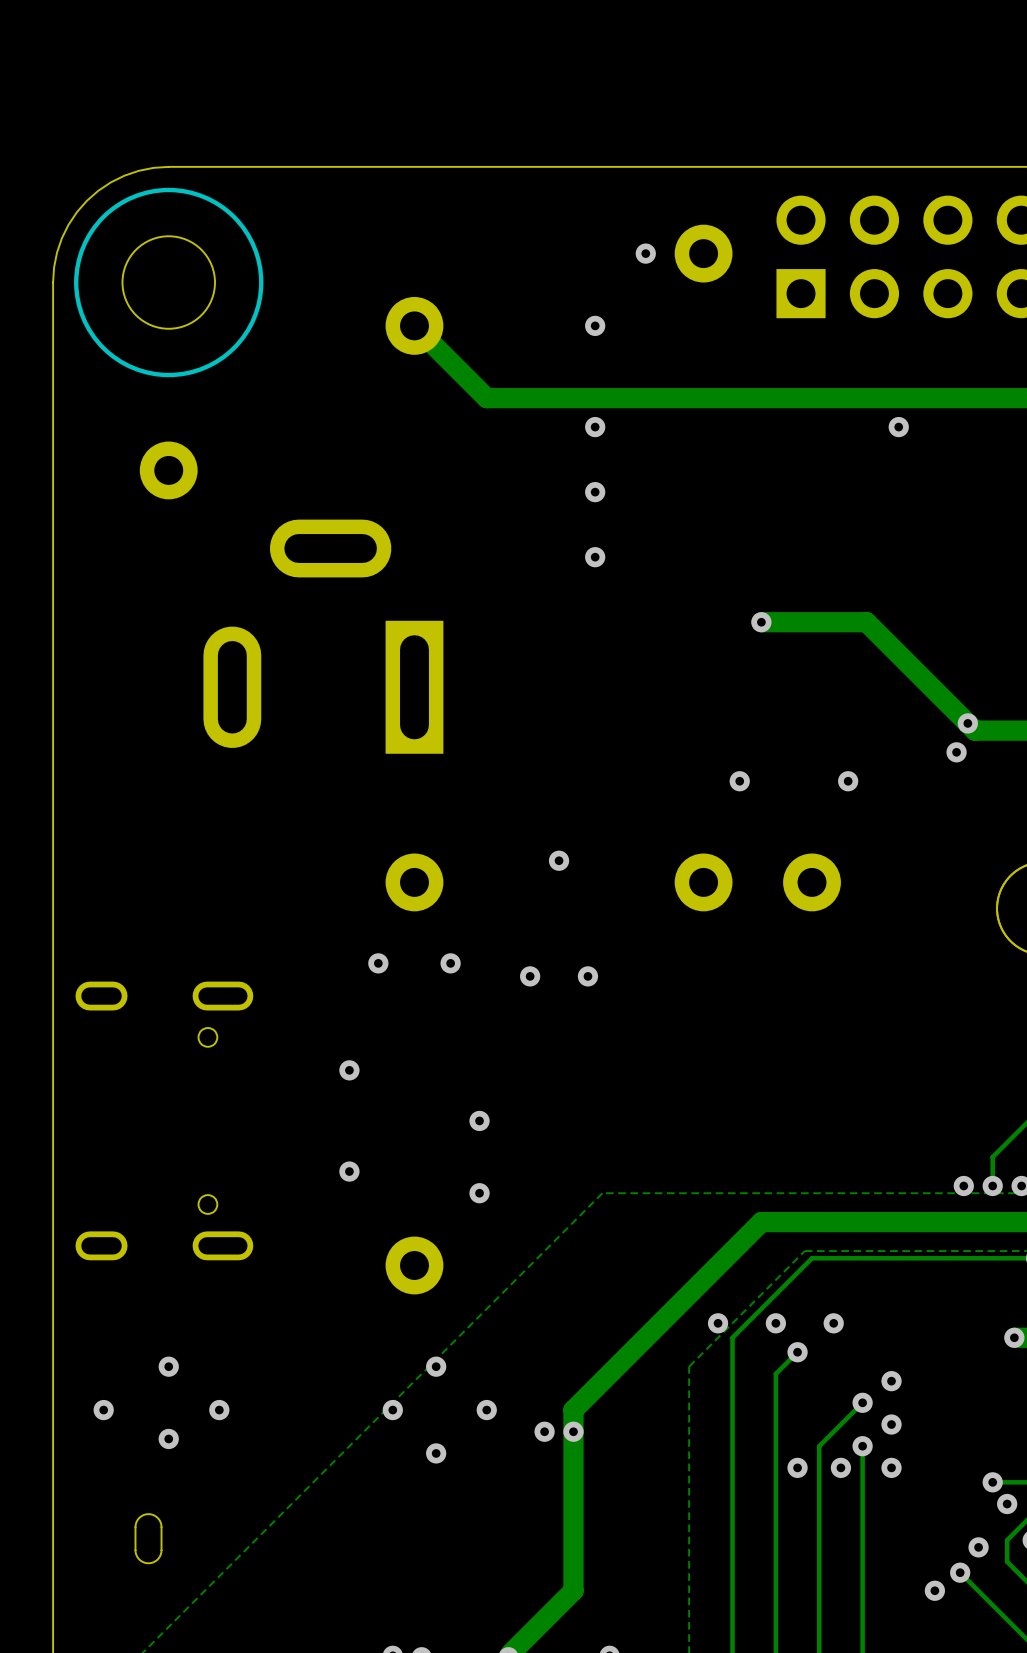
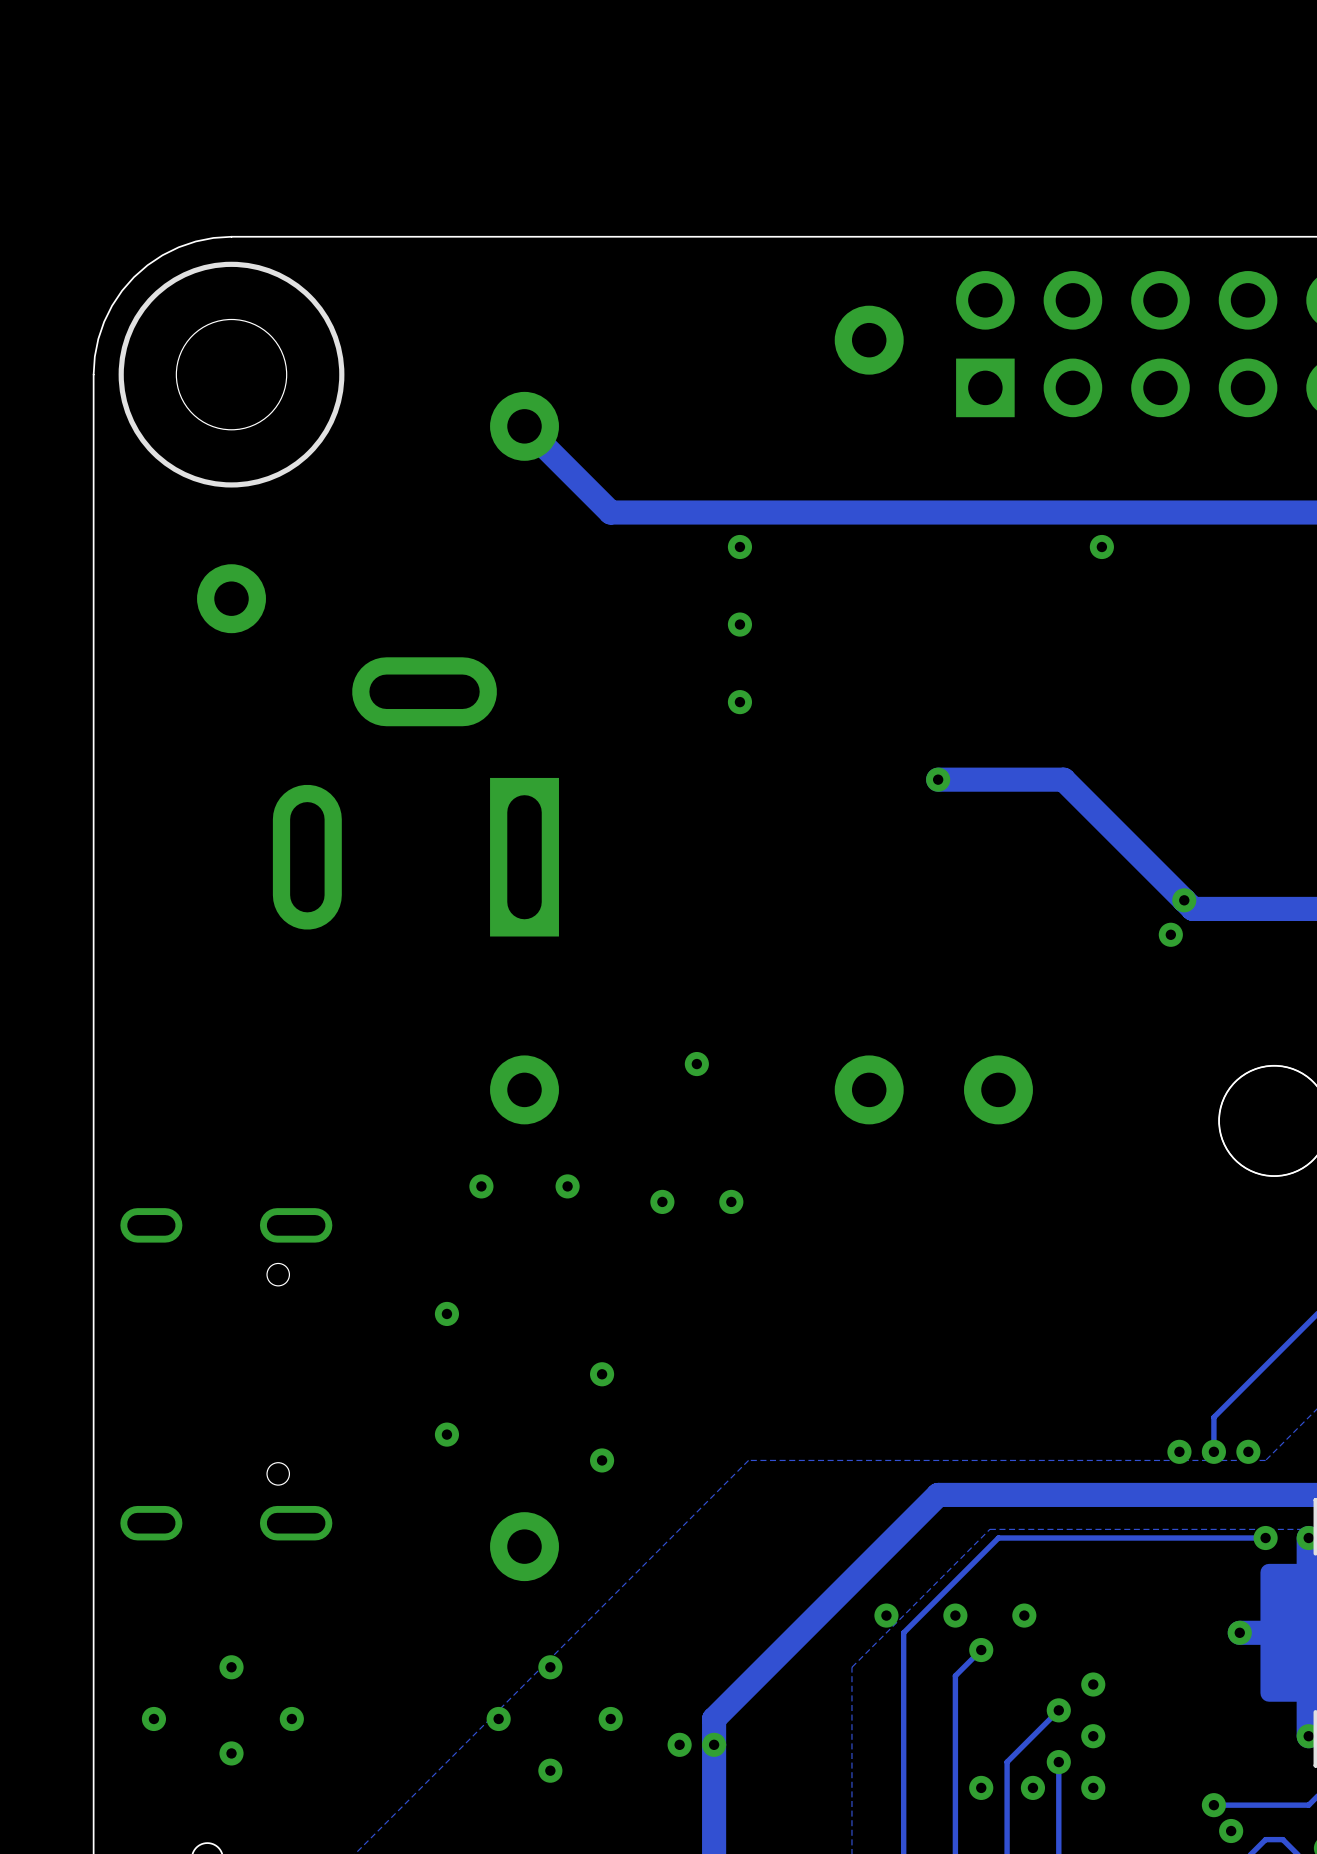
via: (645, 253) -> none
via: (595, 325) -> none
via: (739, 781) -> none
via: (848, 781) -> none

